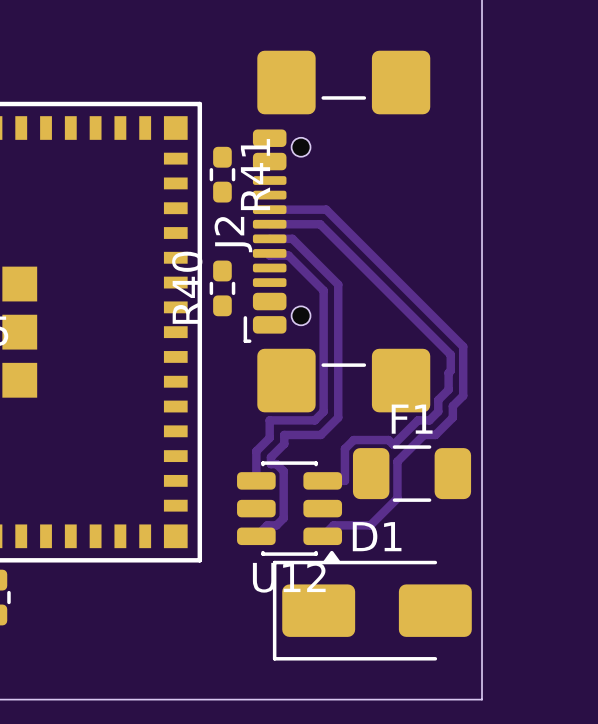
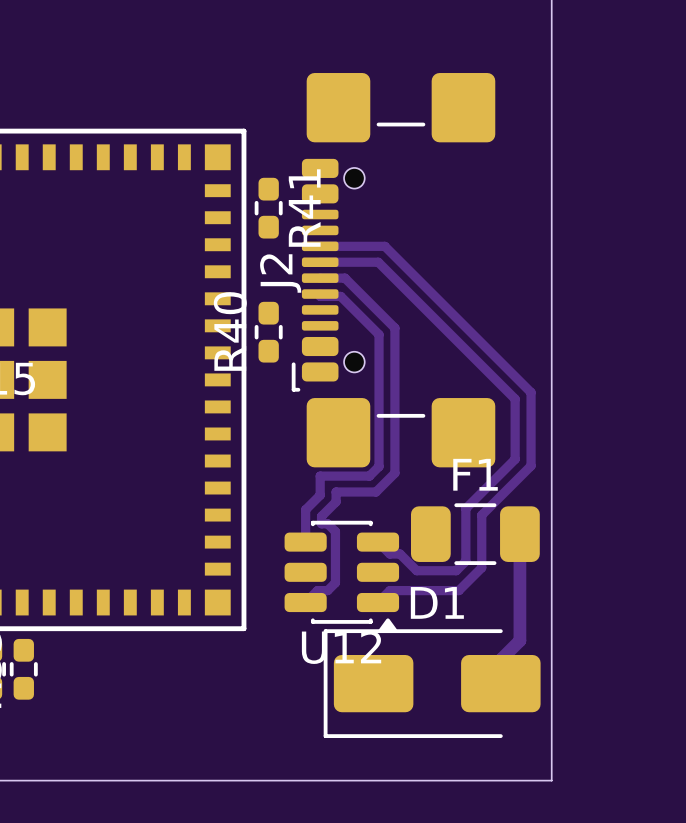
track: (326, 209) (463, 346) (463, 395) (452, 406) (452, 417) (435, 434) (424, 434) (397, 461) (397, 498) (370, 525) -> (381, 246) (384, 246) (531, 392) (531, 465) (481, 515) (481, 567) (458, 590) (430, 590)
track: (320, 224) (450, 354) (448, 389) (438, 400) (438, 411) (429, 420) (418, 420) (393, 444) (388, 440) (353, 440) (344, 448) (344, 480) (322, 480) -> (375, 262) (378, 262) (515, 399) (515, 459) (465, 508) (465, 561) (456, 570) (416, 570) (400, 554) (389, 554) (378, 542)
track: none -> (519, 534) (519, 640) (500, 659) (500, 683)

